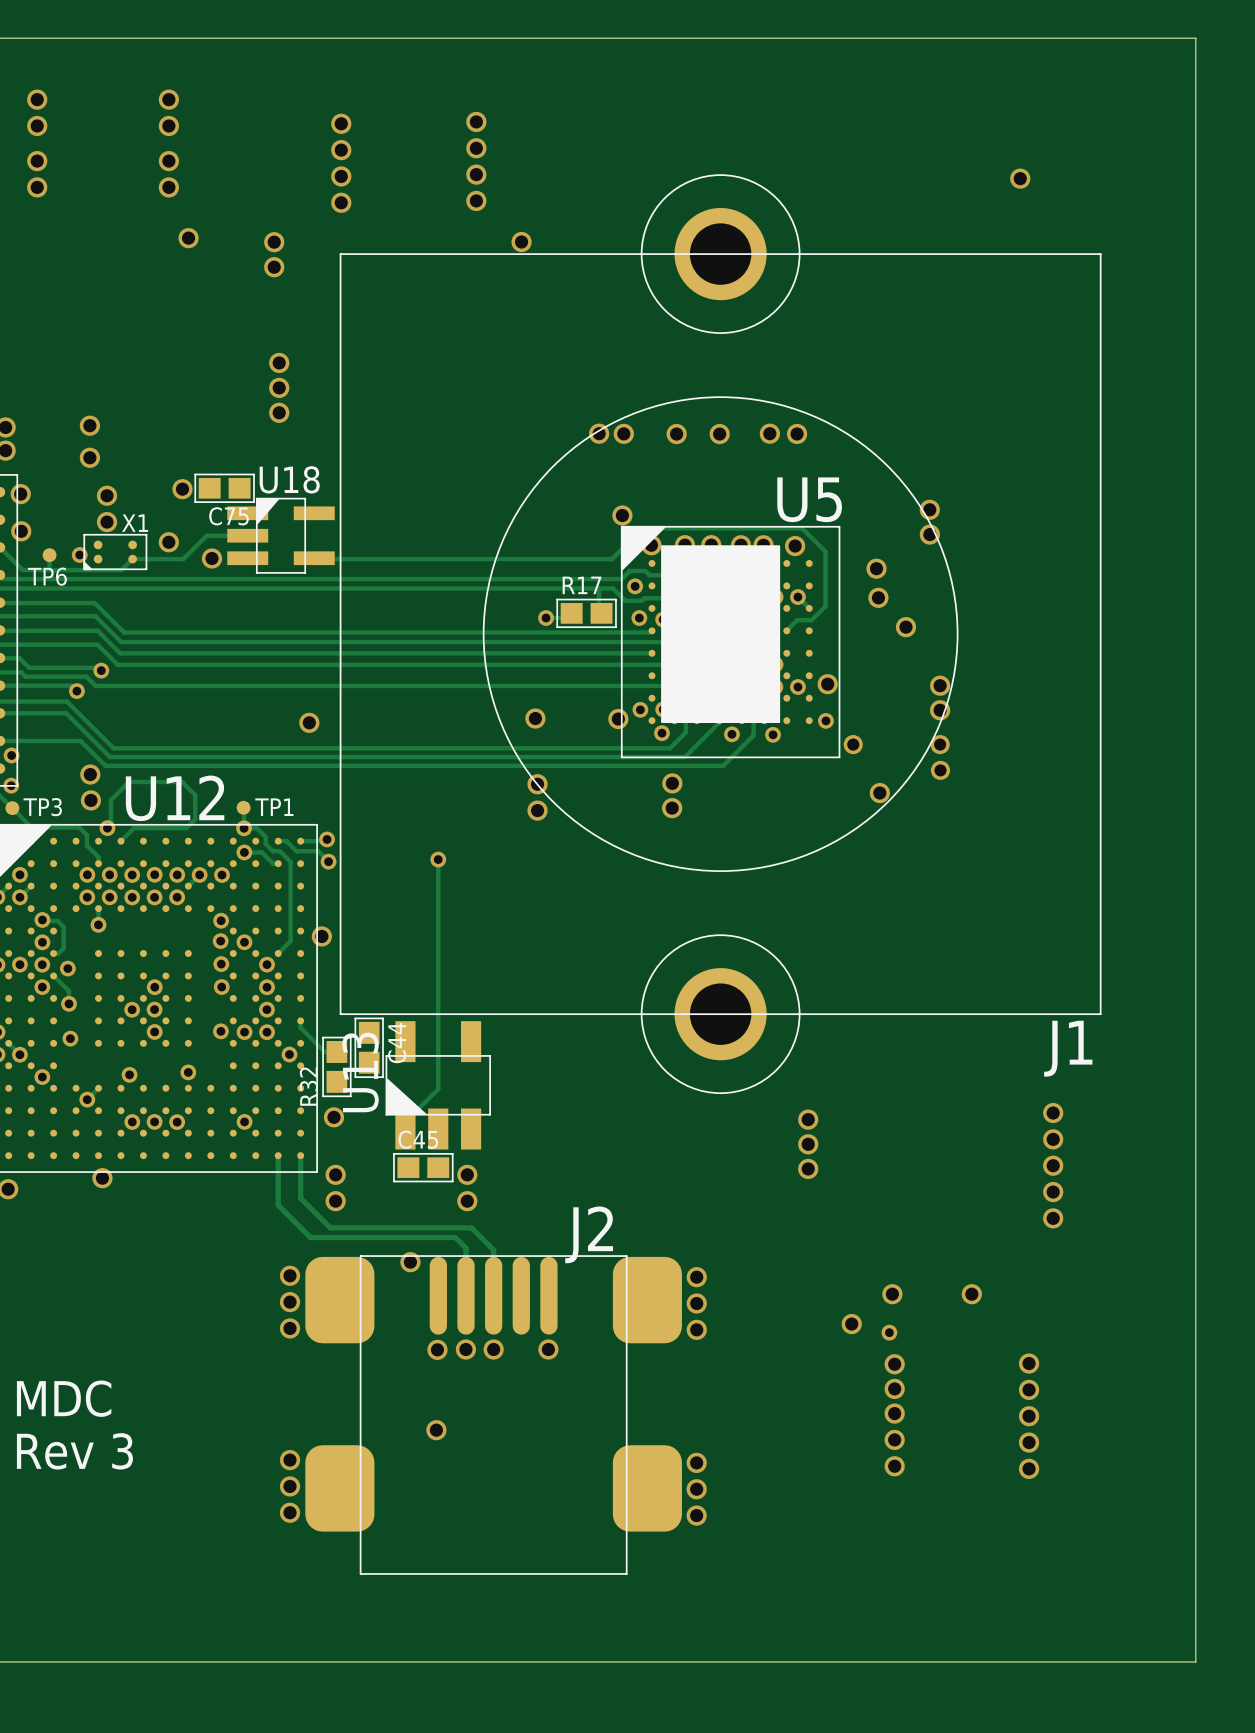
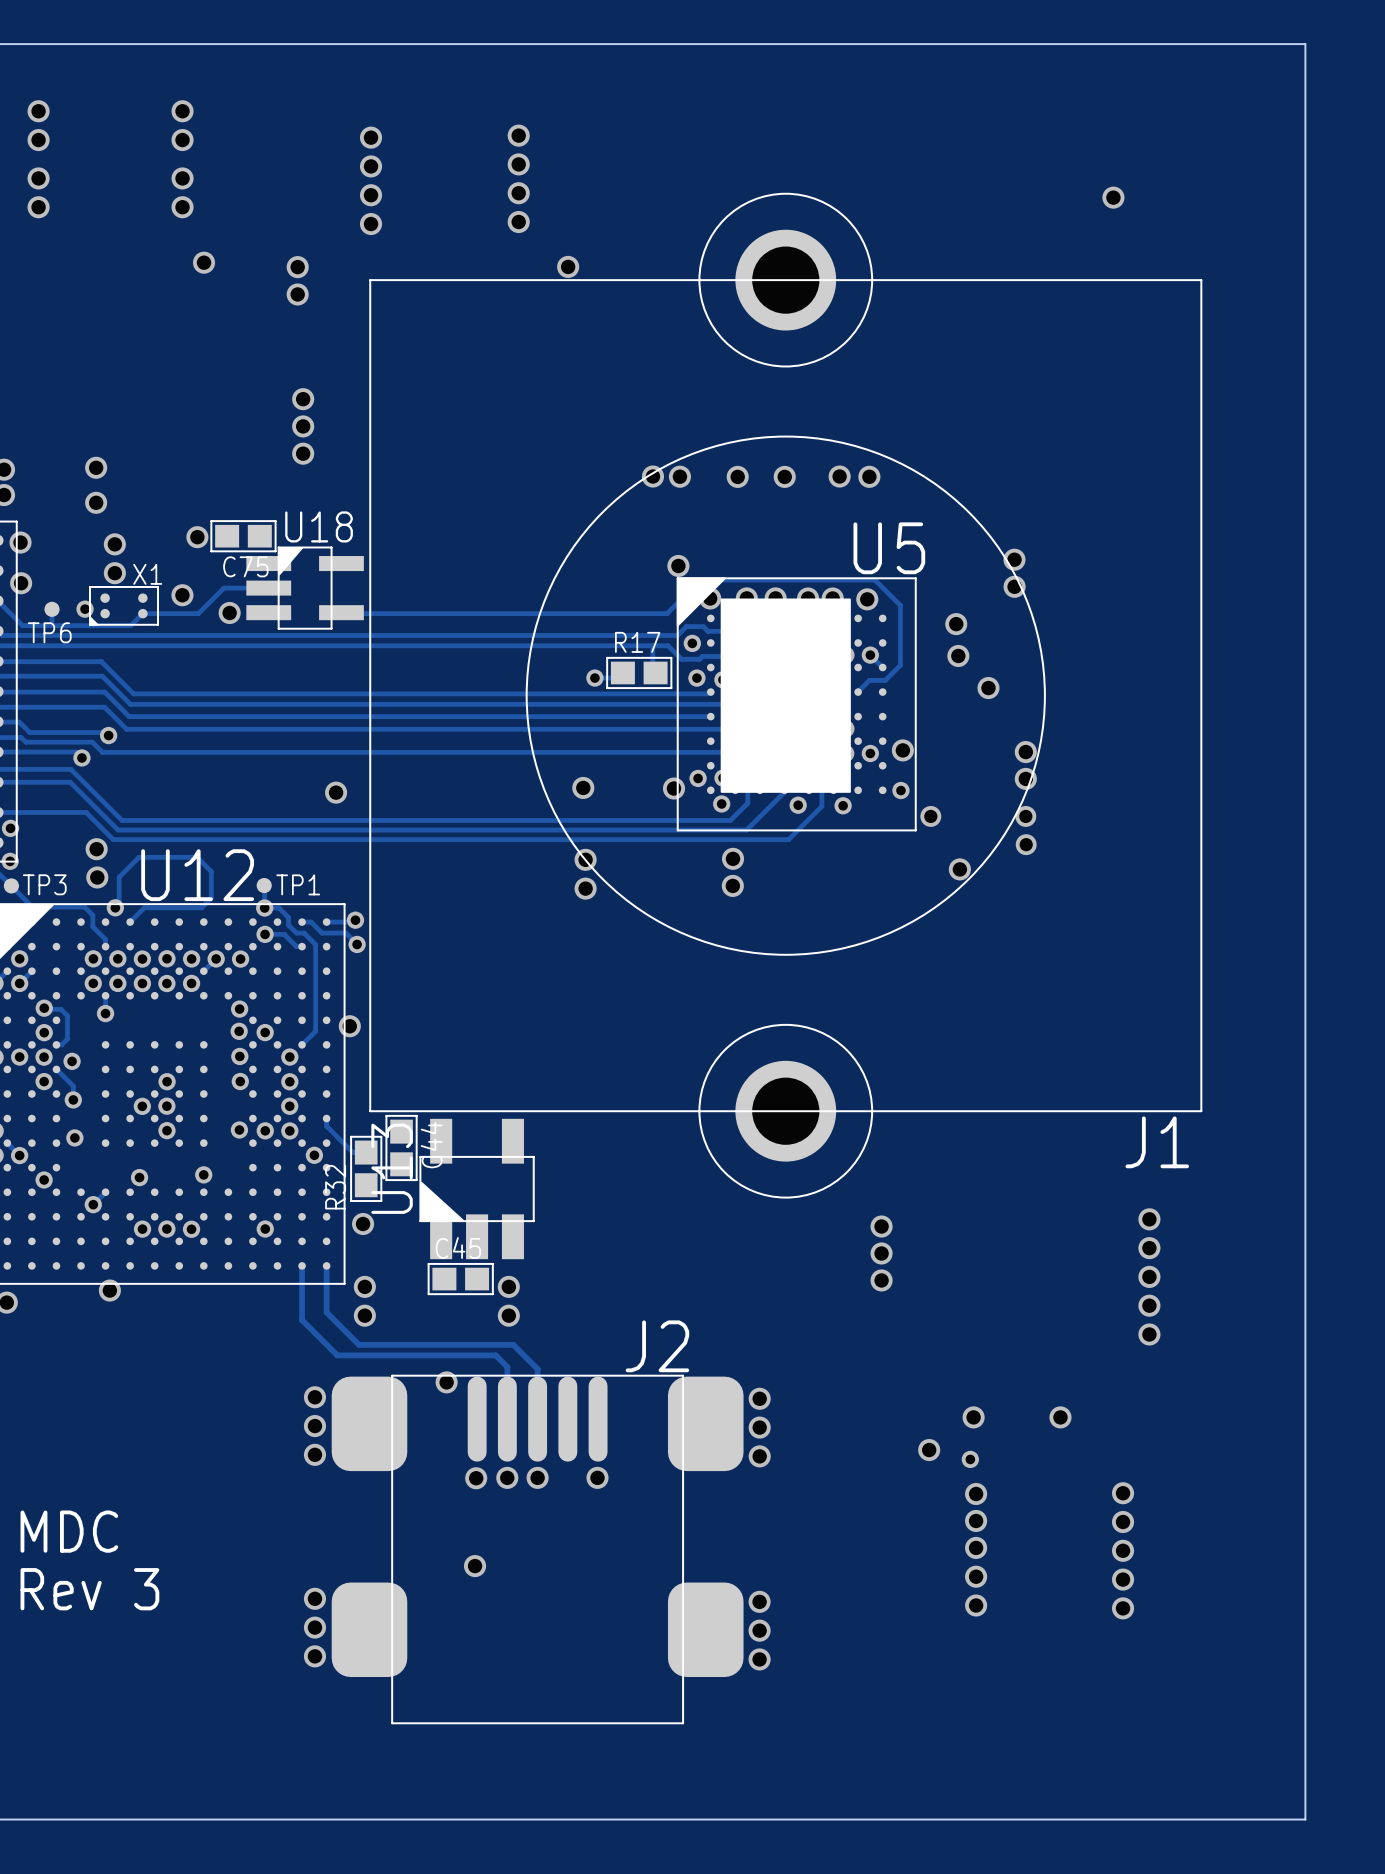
track: (438, 859) (438, 1089) (405, 1121) (405, 1129) -> none
via: (438, 859) -> none

